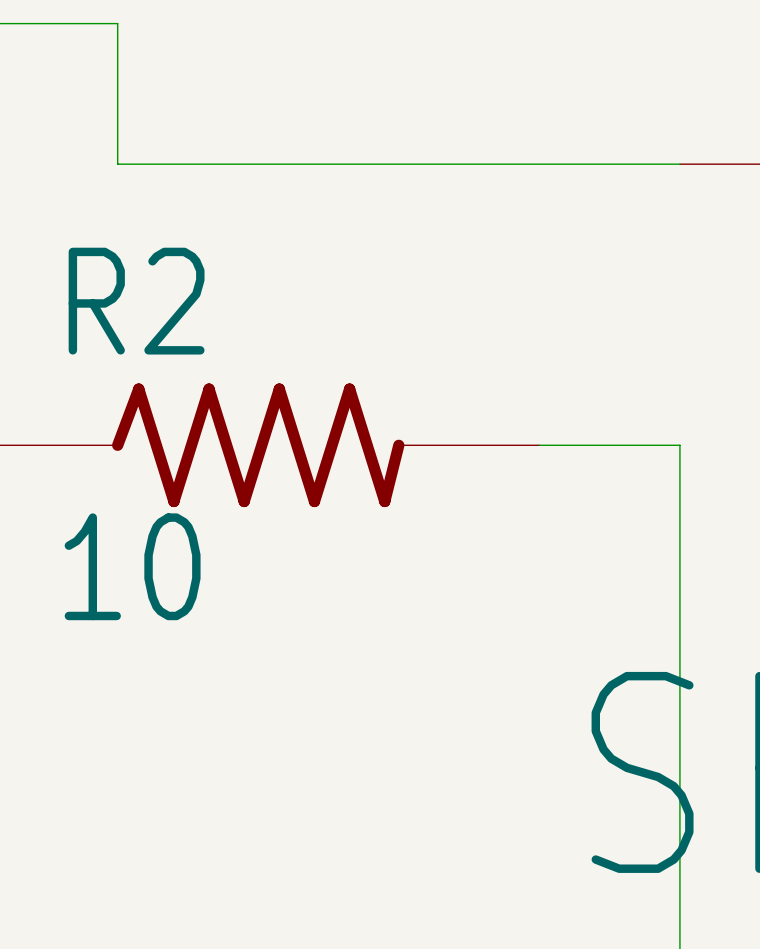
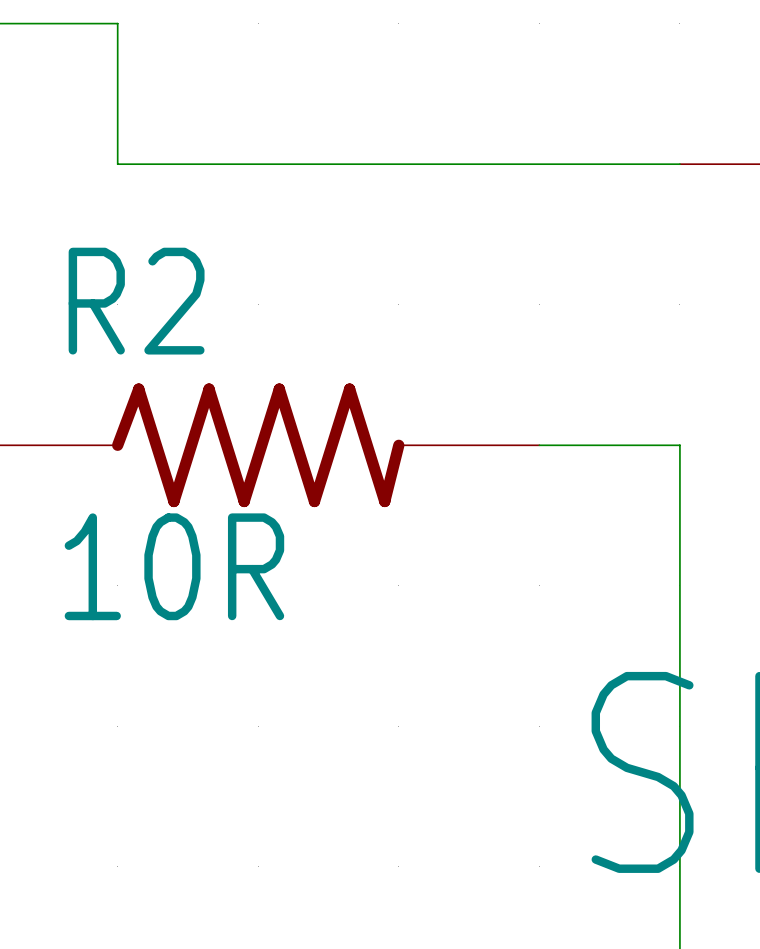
R2 value: 10 (132, 566) -> 10R (174, 566)

